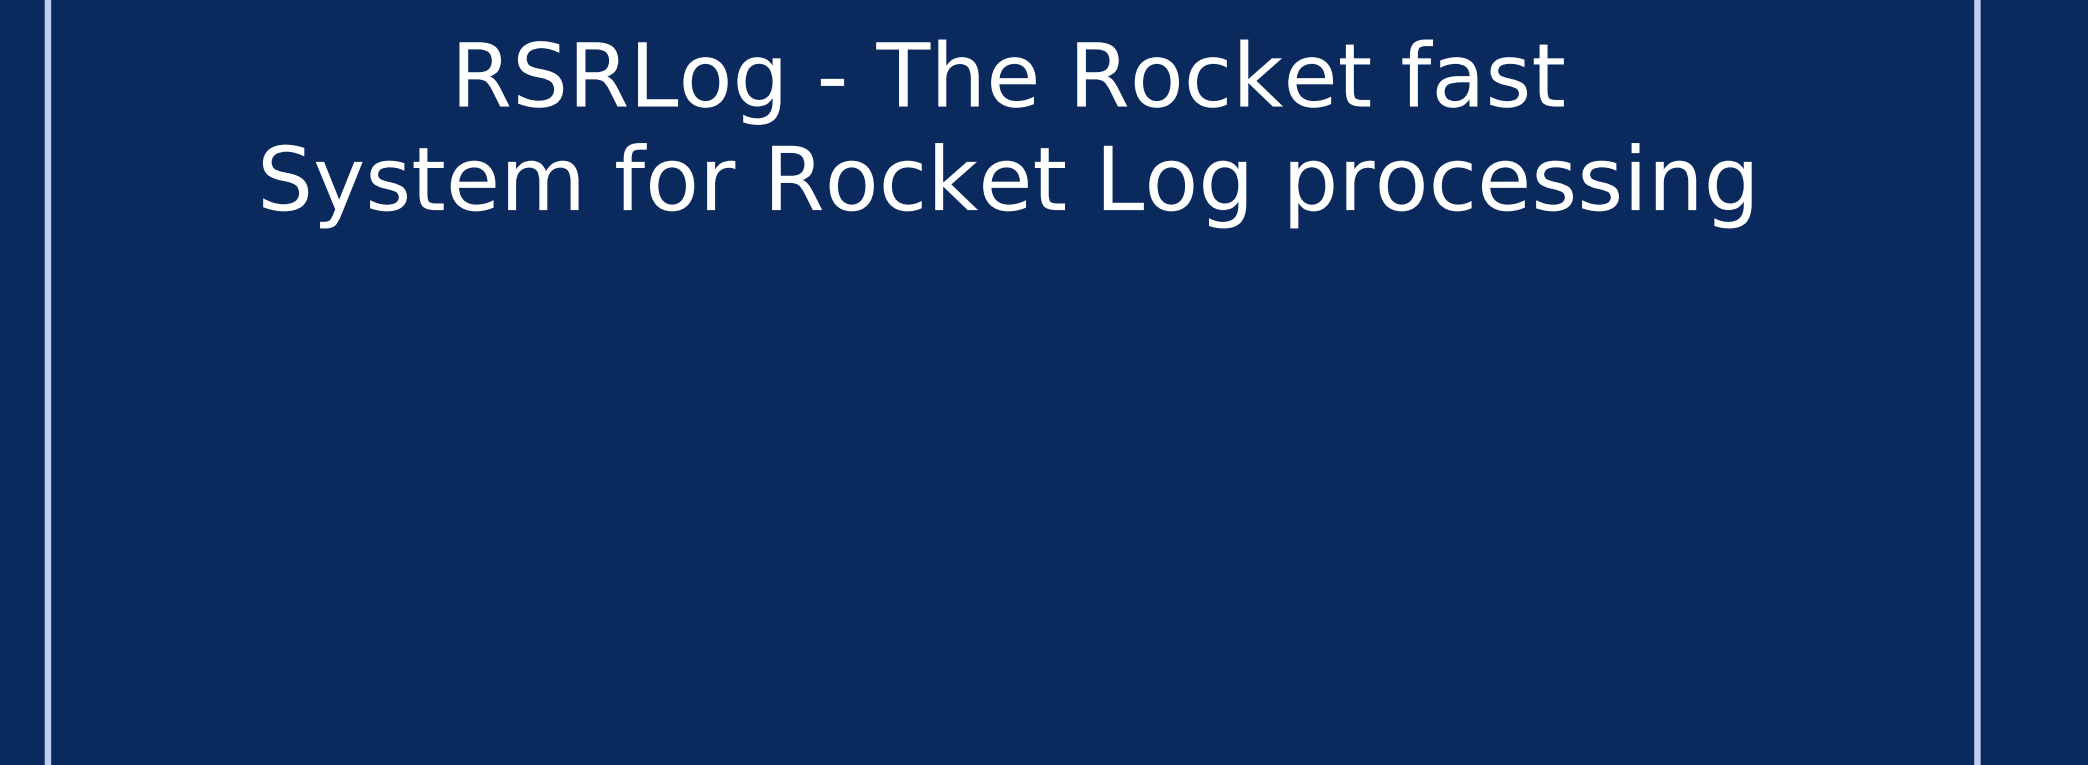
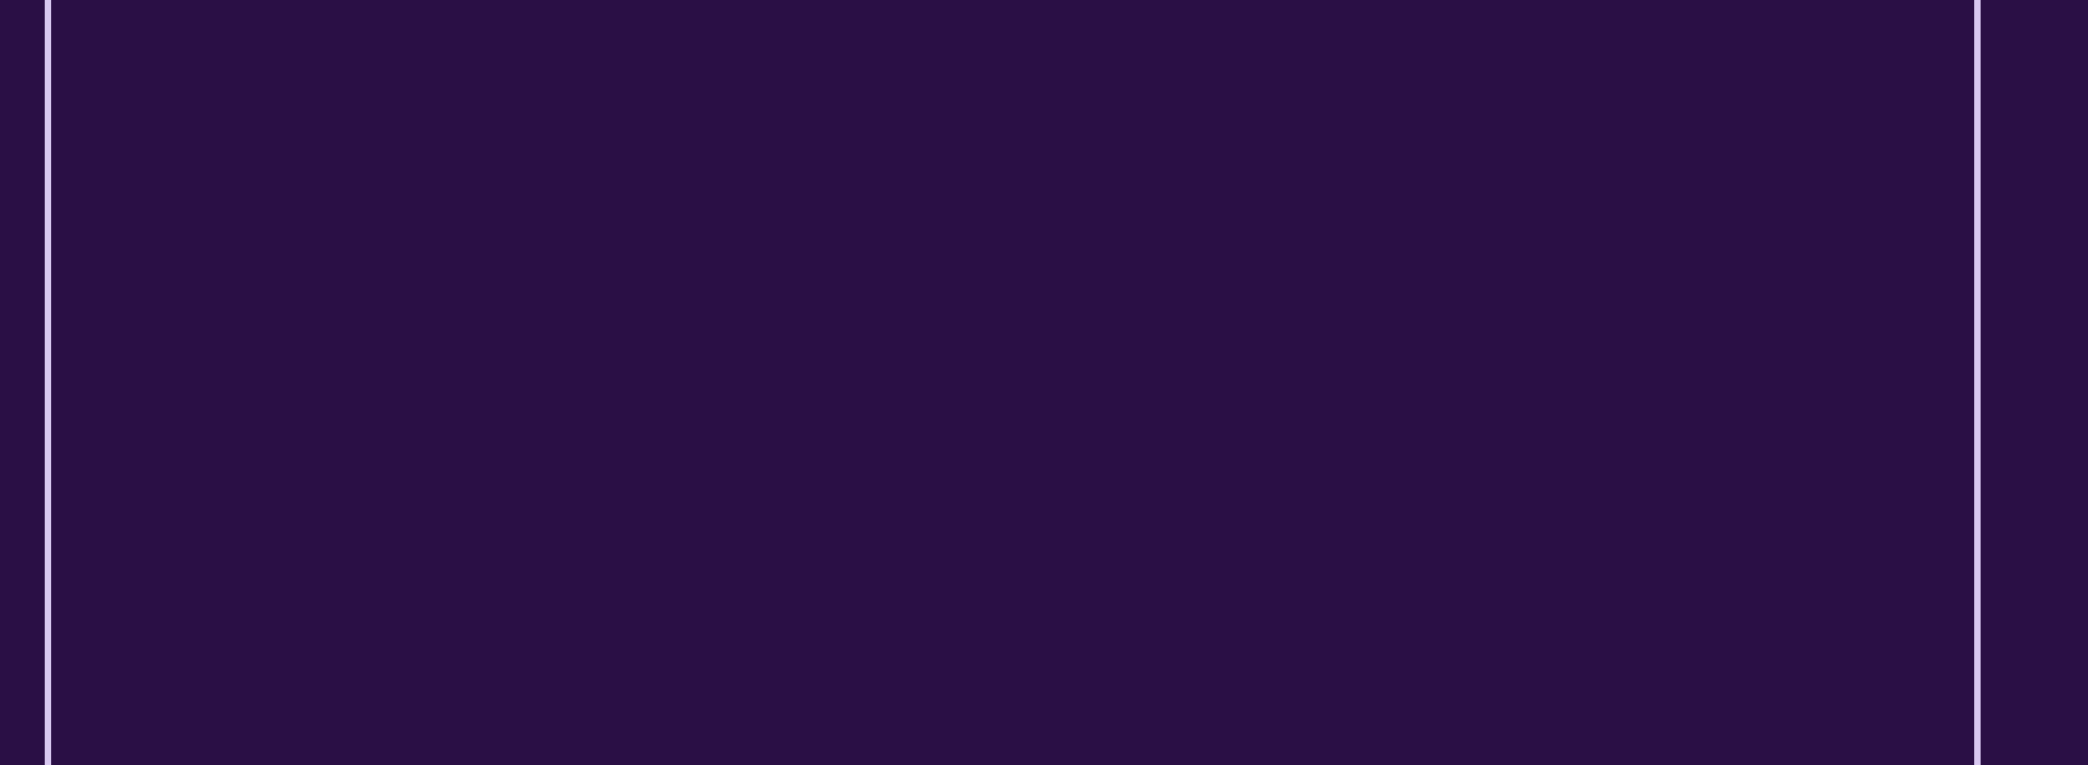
text: RSRLog - The Rocket fast (1011, 82) -> none
text: System for Rocket Log processing (1007, 185) -> none

